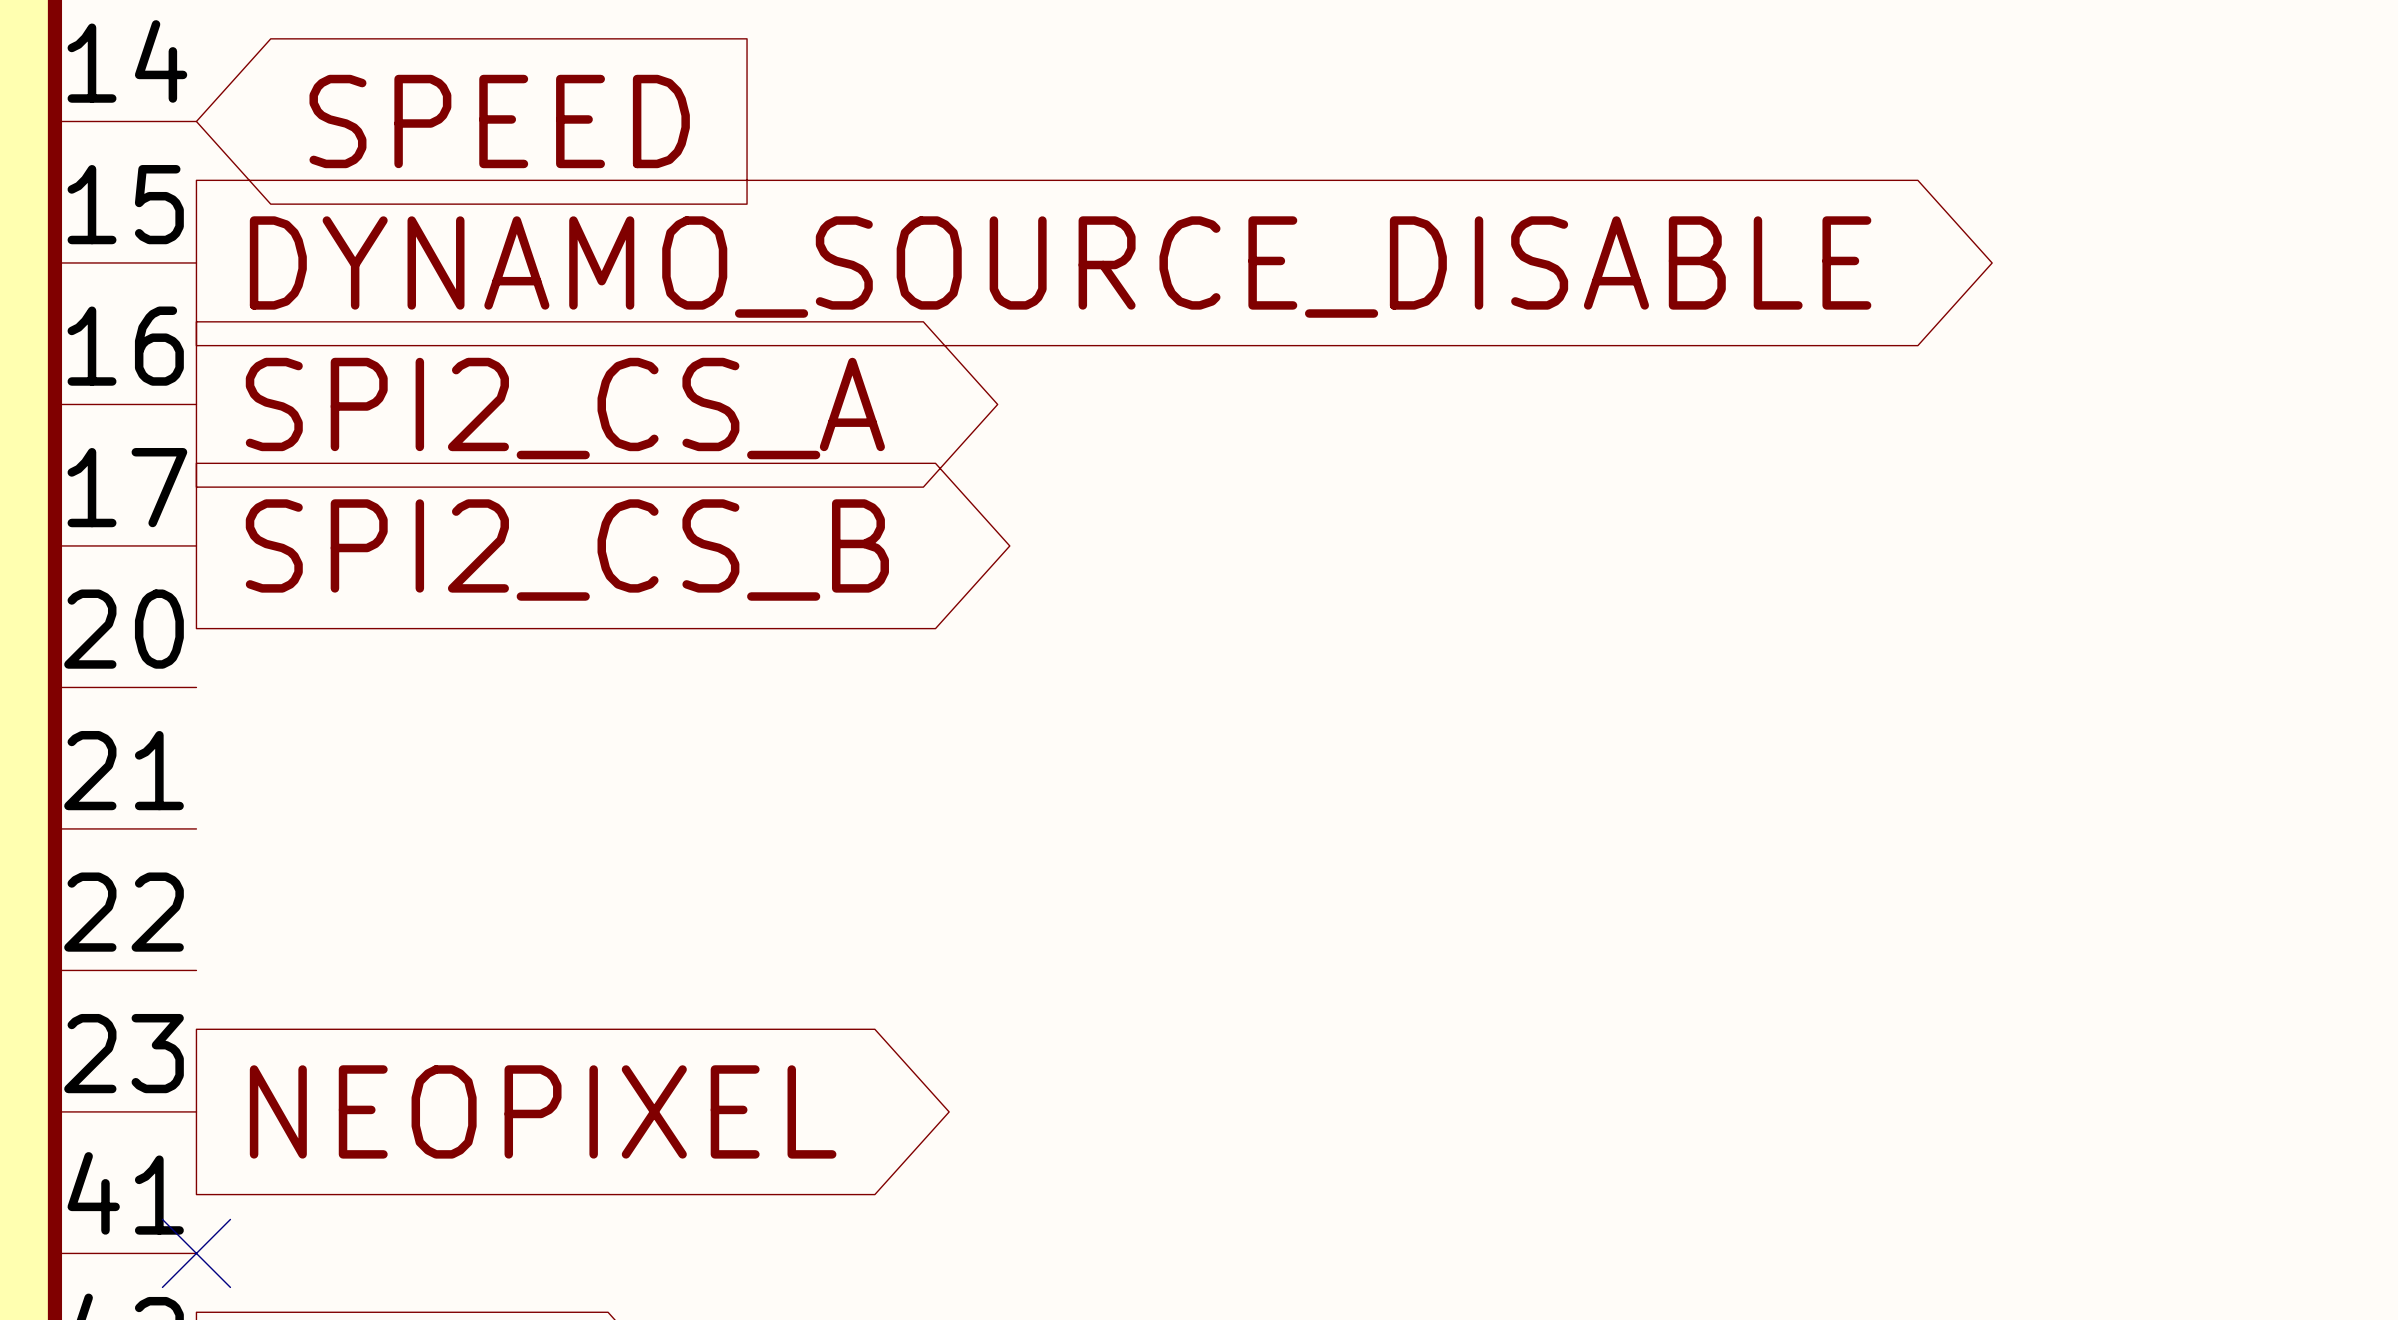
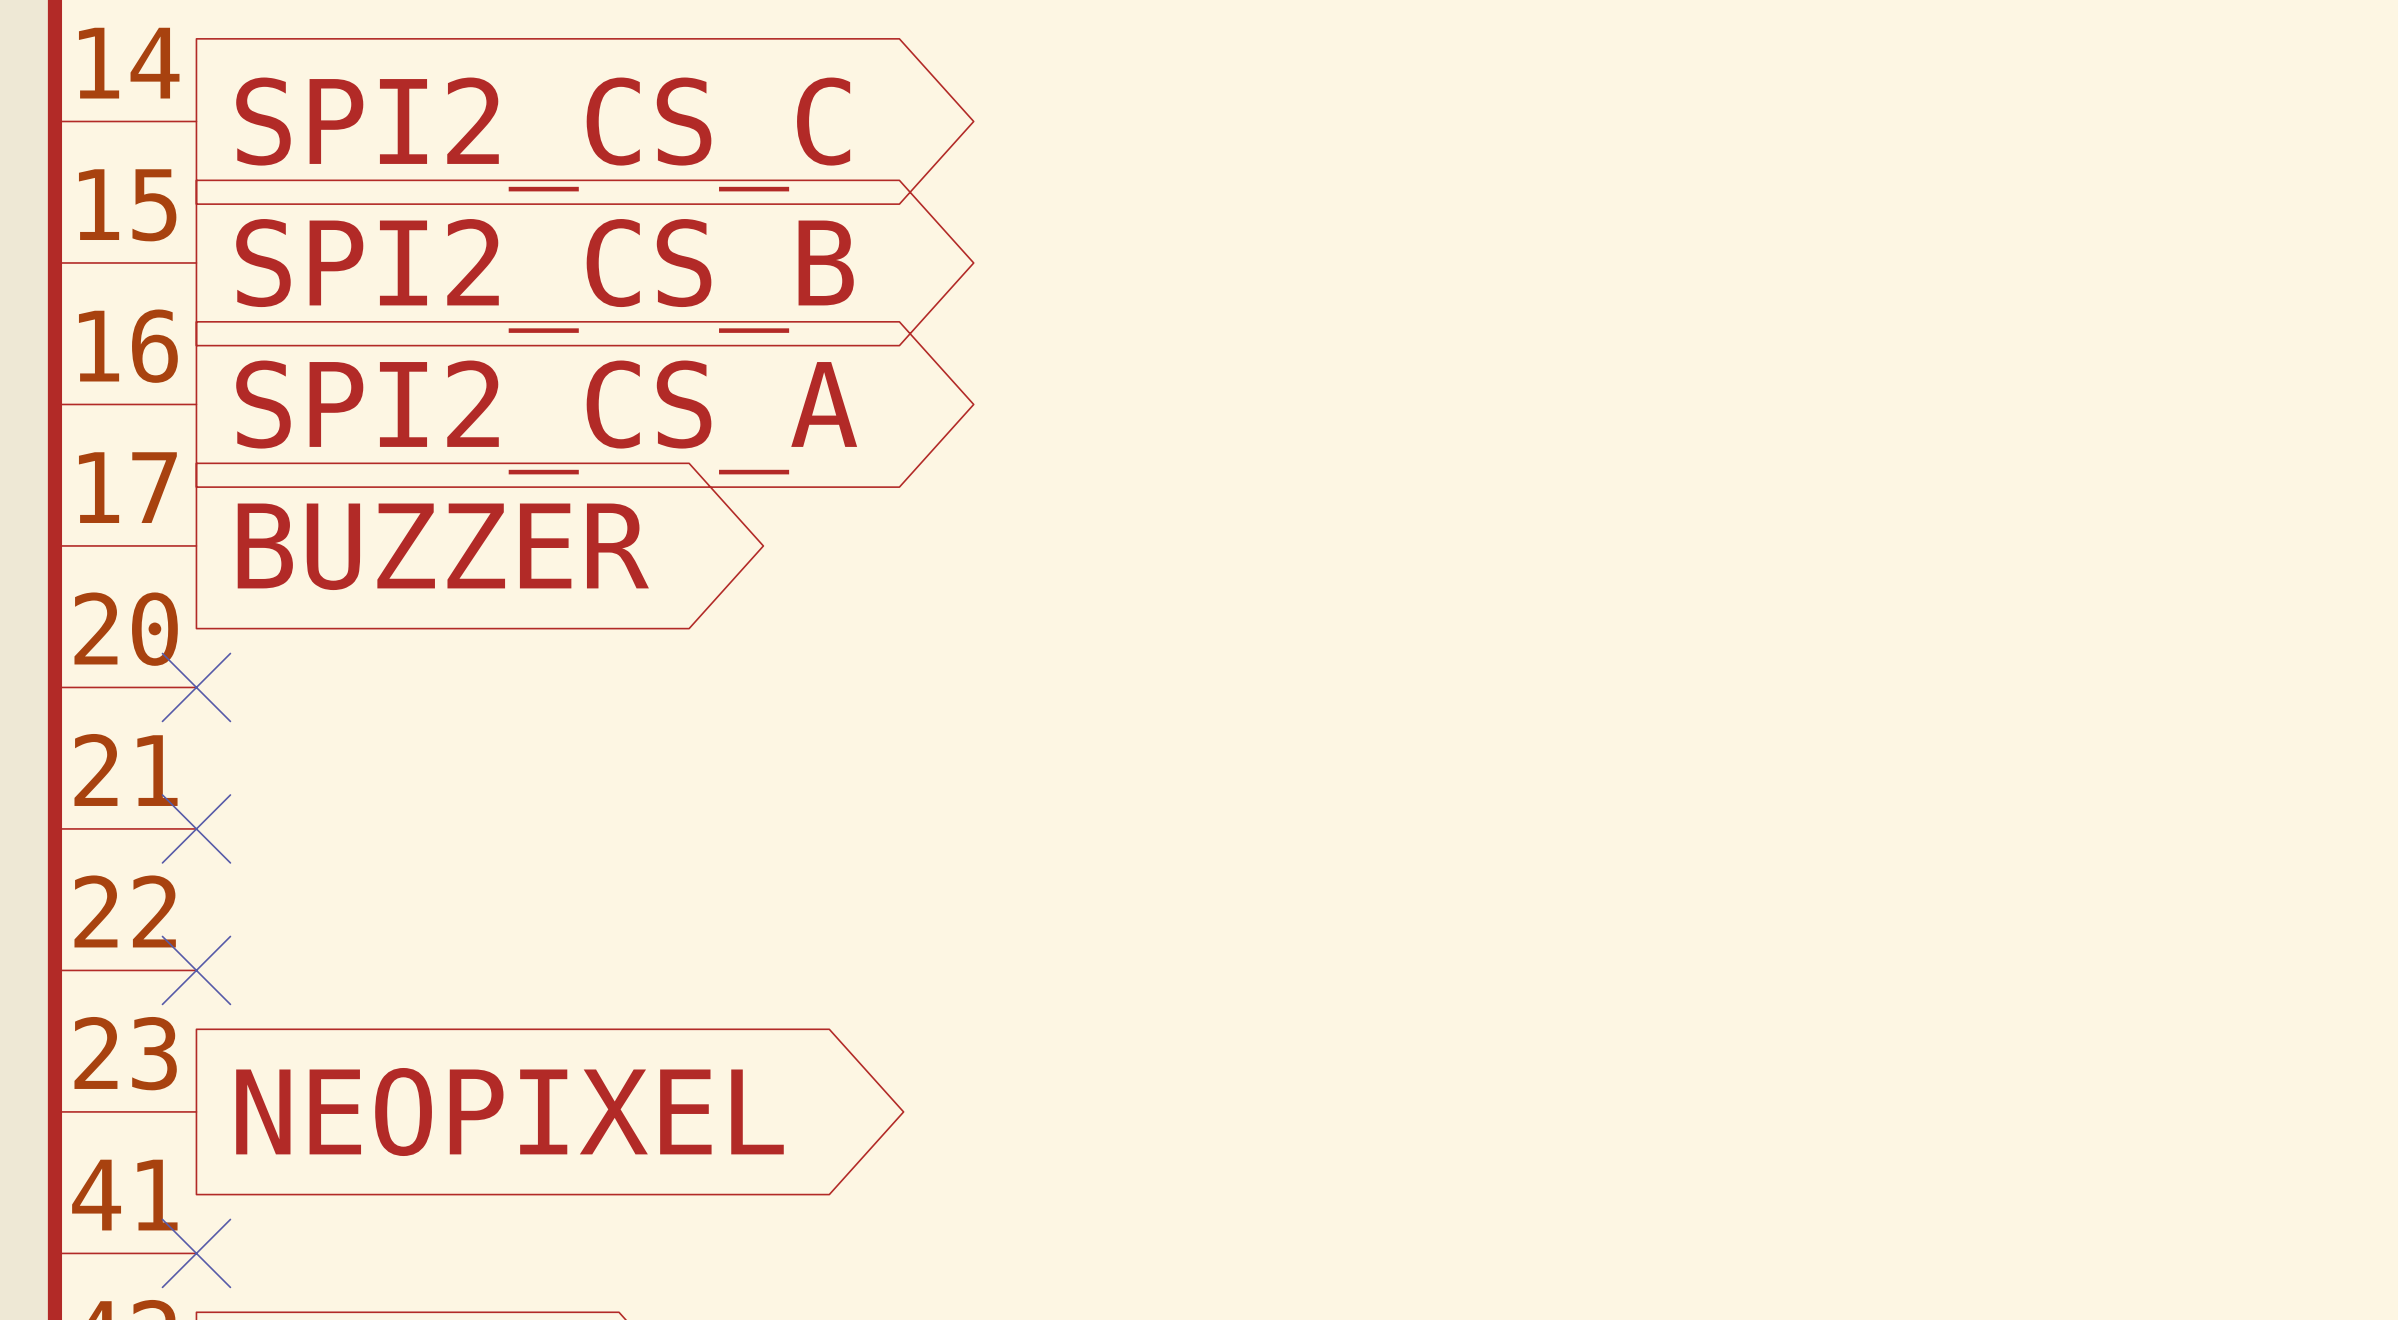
global label shape: input (499, 121) -> output (543, 134)
global label: SPEED (499, 121) -> SPI2_CS_C (543, 134)
global label: DYNAMO_SOURCE_DISABLE (1060, 267) -> SPI2_CS_B (544, 275)
global label: SPI2_CS_B (567, 550) -> BUZZER (443, 546)
no-connect mark: none -> (196, 687)
no-connect mark: none -> (196, 828)
no-connect mark: none -> (196, 970)

